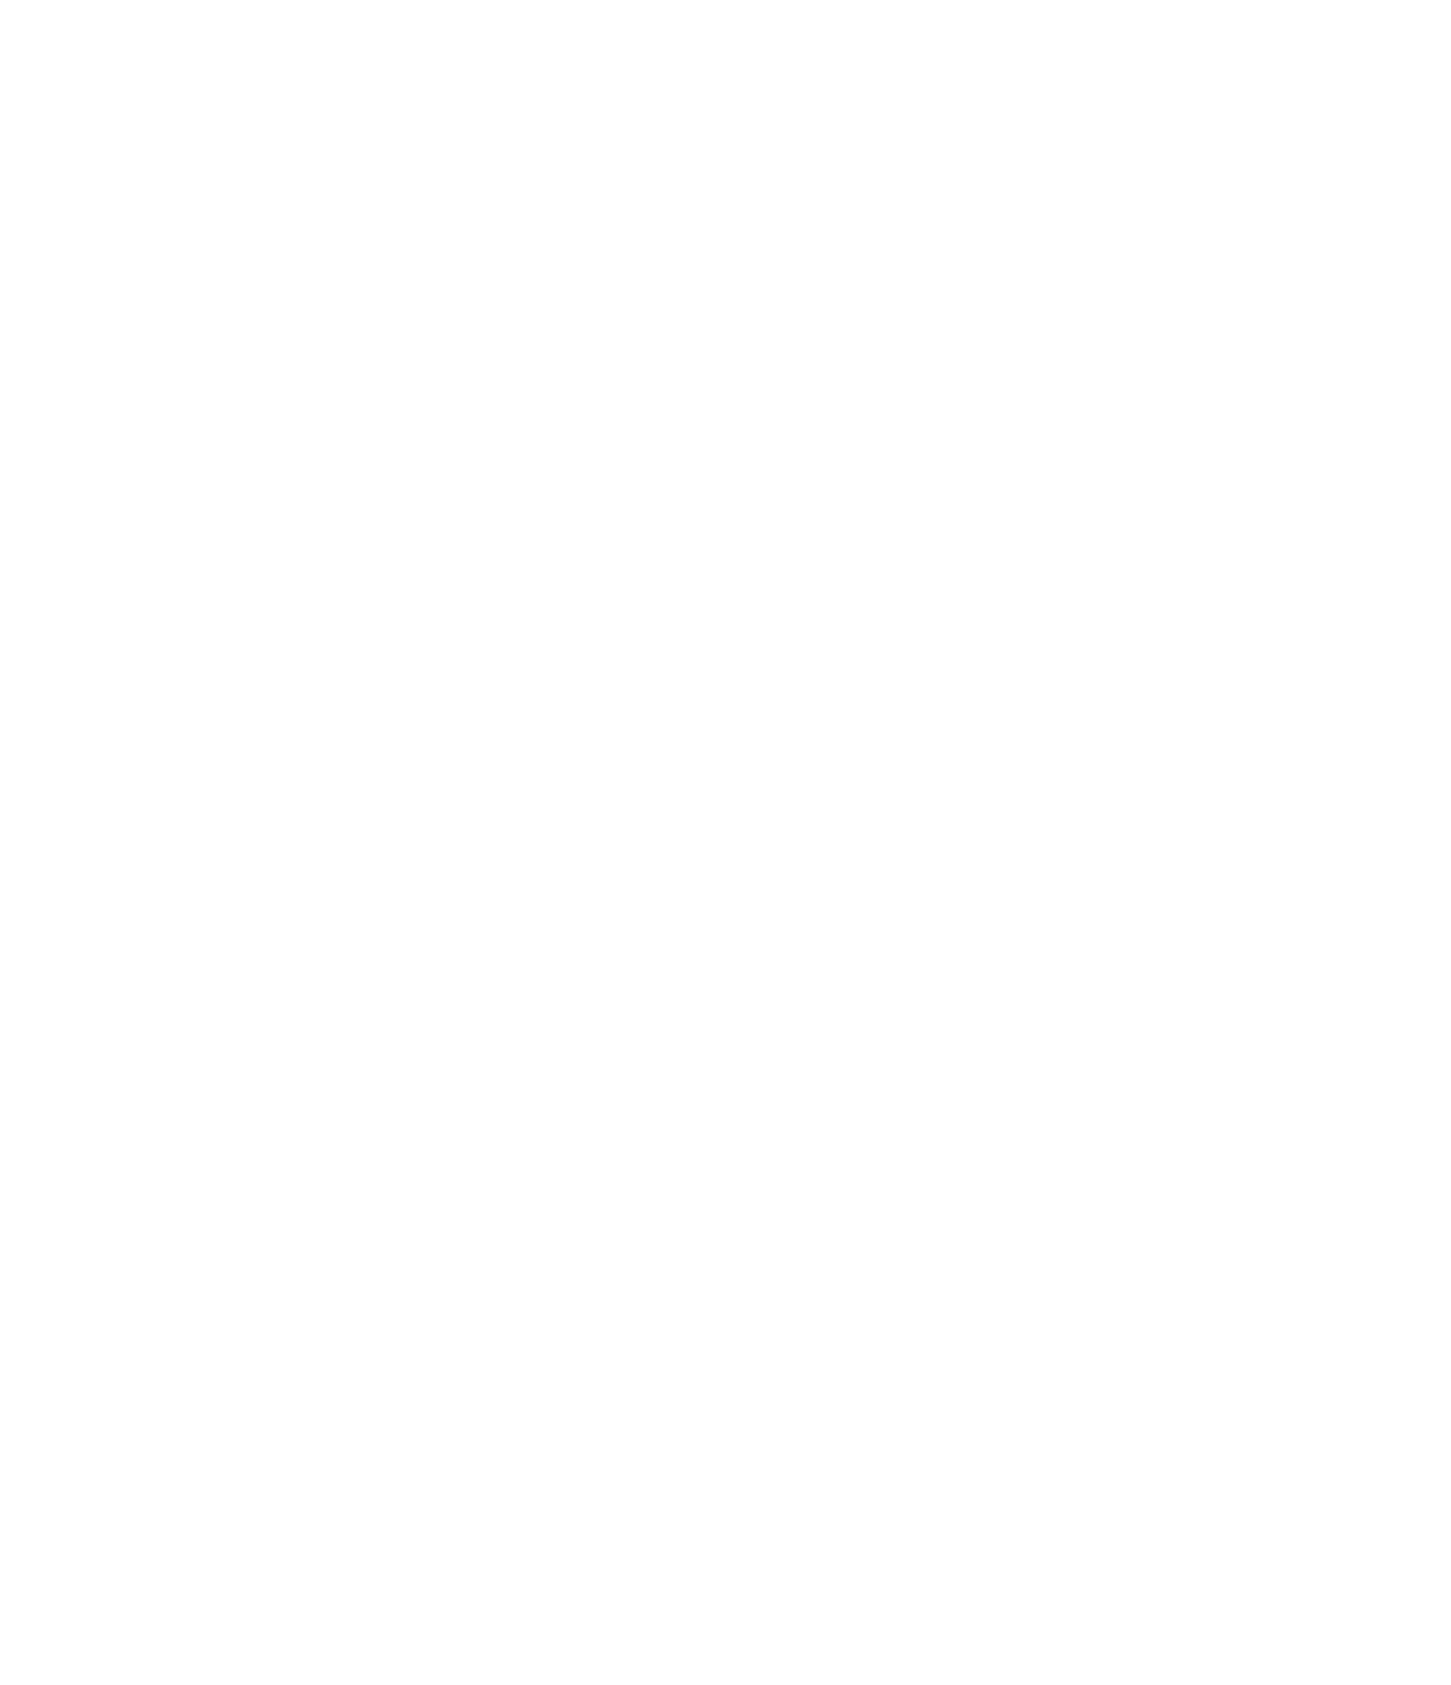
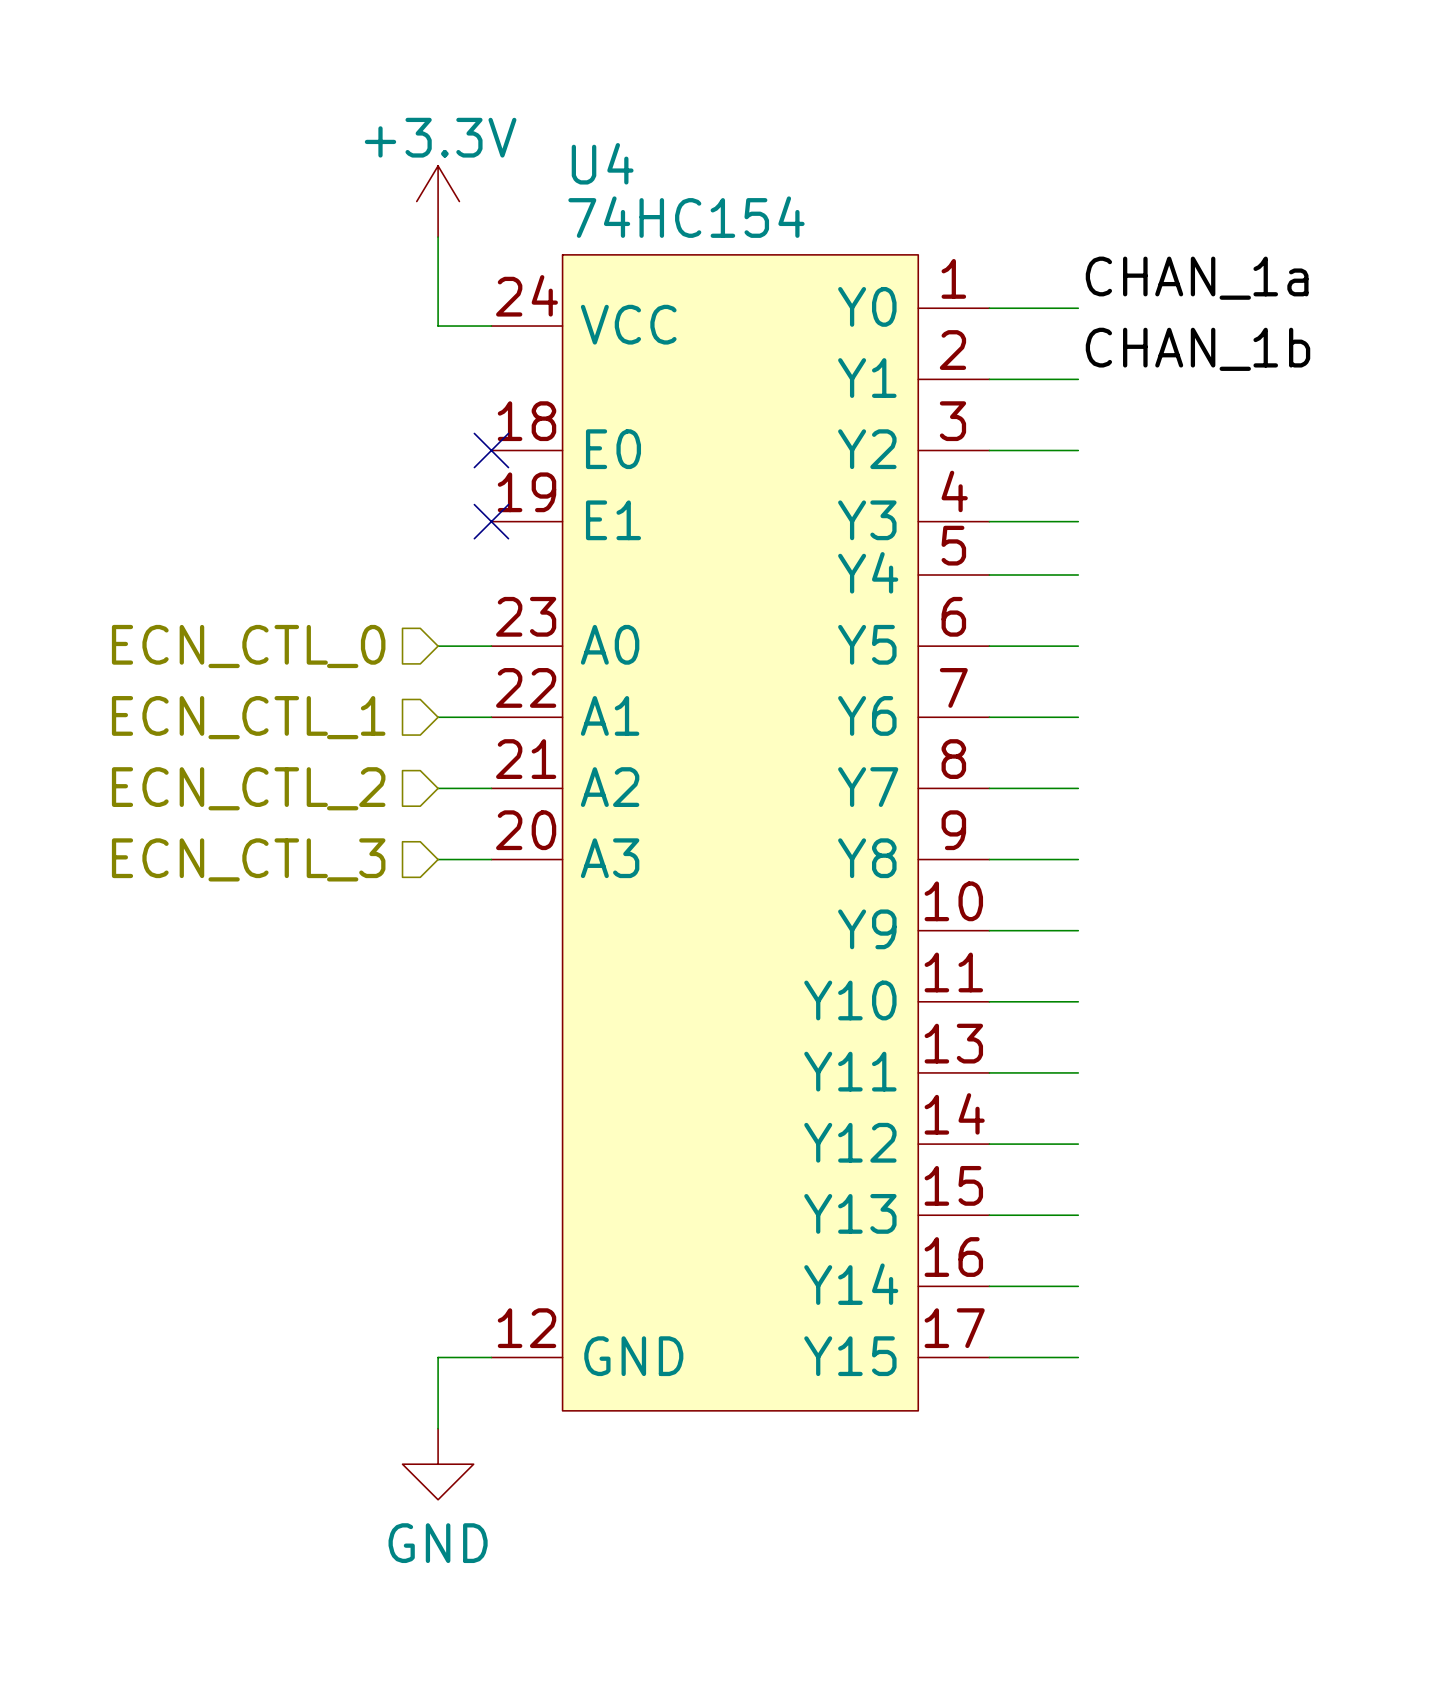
power symbol: none -> +3.3V (438, 201)
wire: none -> (438, 237) (438, 326) (491, 326)
label: none -> CHAN_1a (1197, 278)
wire: none -> (989, 308) (1078, 308)
label: none -> CHAN_1b (1197, 349)
wire: none -> (989, 379) (1078, 379)
no-connect mark: none -> (491, 450)
wire: none -> (989, 450) (1078, 450)
no-connect mark: none -> (491, 521)
wire: none -> (989, 521) (1078, 521)
wire: none -> (989, 574) (1078, 574)
hierarchical label: none -> ECN_CTL_0 (248, 646)
wire: none -> (438, 646) (491, 646)
wire: none -> (989, 646) (1078, 646)
hierarchical label: none -> ECN_CTL_1 (248, 717)
wire: none -> (438, 717) (491, 717)
wire: none -> (989, 717) (1078, 717)
hierarchical label: none -> ECN_CTL_2 (248, 788)
wire: none -> (438, 788) (491, 788)
wire: none -> (989, 788) (1078, 788)
U4: none -> 74HC154 (740, 832)
hierarchical label: none -> ECN_CTL_3 (248, 859)
wire: none -> (438, 859) (491, 859)
wire: none -> (989, 859) (1078, 859)
wire: none -> (989, 930) (1078, 930)
wire: none -> (989, 1001) (1078, 1001)
wire: none -> (989, 1072) (1078, 1072)
wire: none -> (989, 1144) (1078, 1144)
wire: none -> (989, 1215) (1078, 1215)
wire: none -> (989, 1286) (1078, 1286)
wire: none -> (491, 1357) (438, 1357) (438, 1428)
wire: none -> (989, 1357) (1078, 1357)
power symbol: none -> GND (438, 1464)

